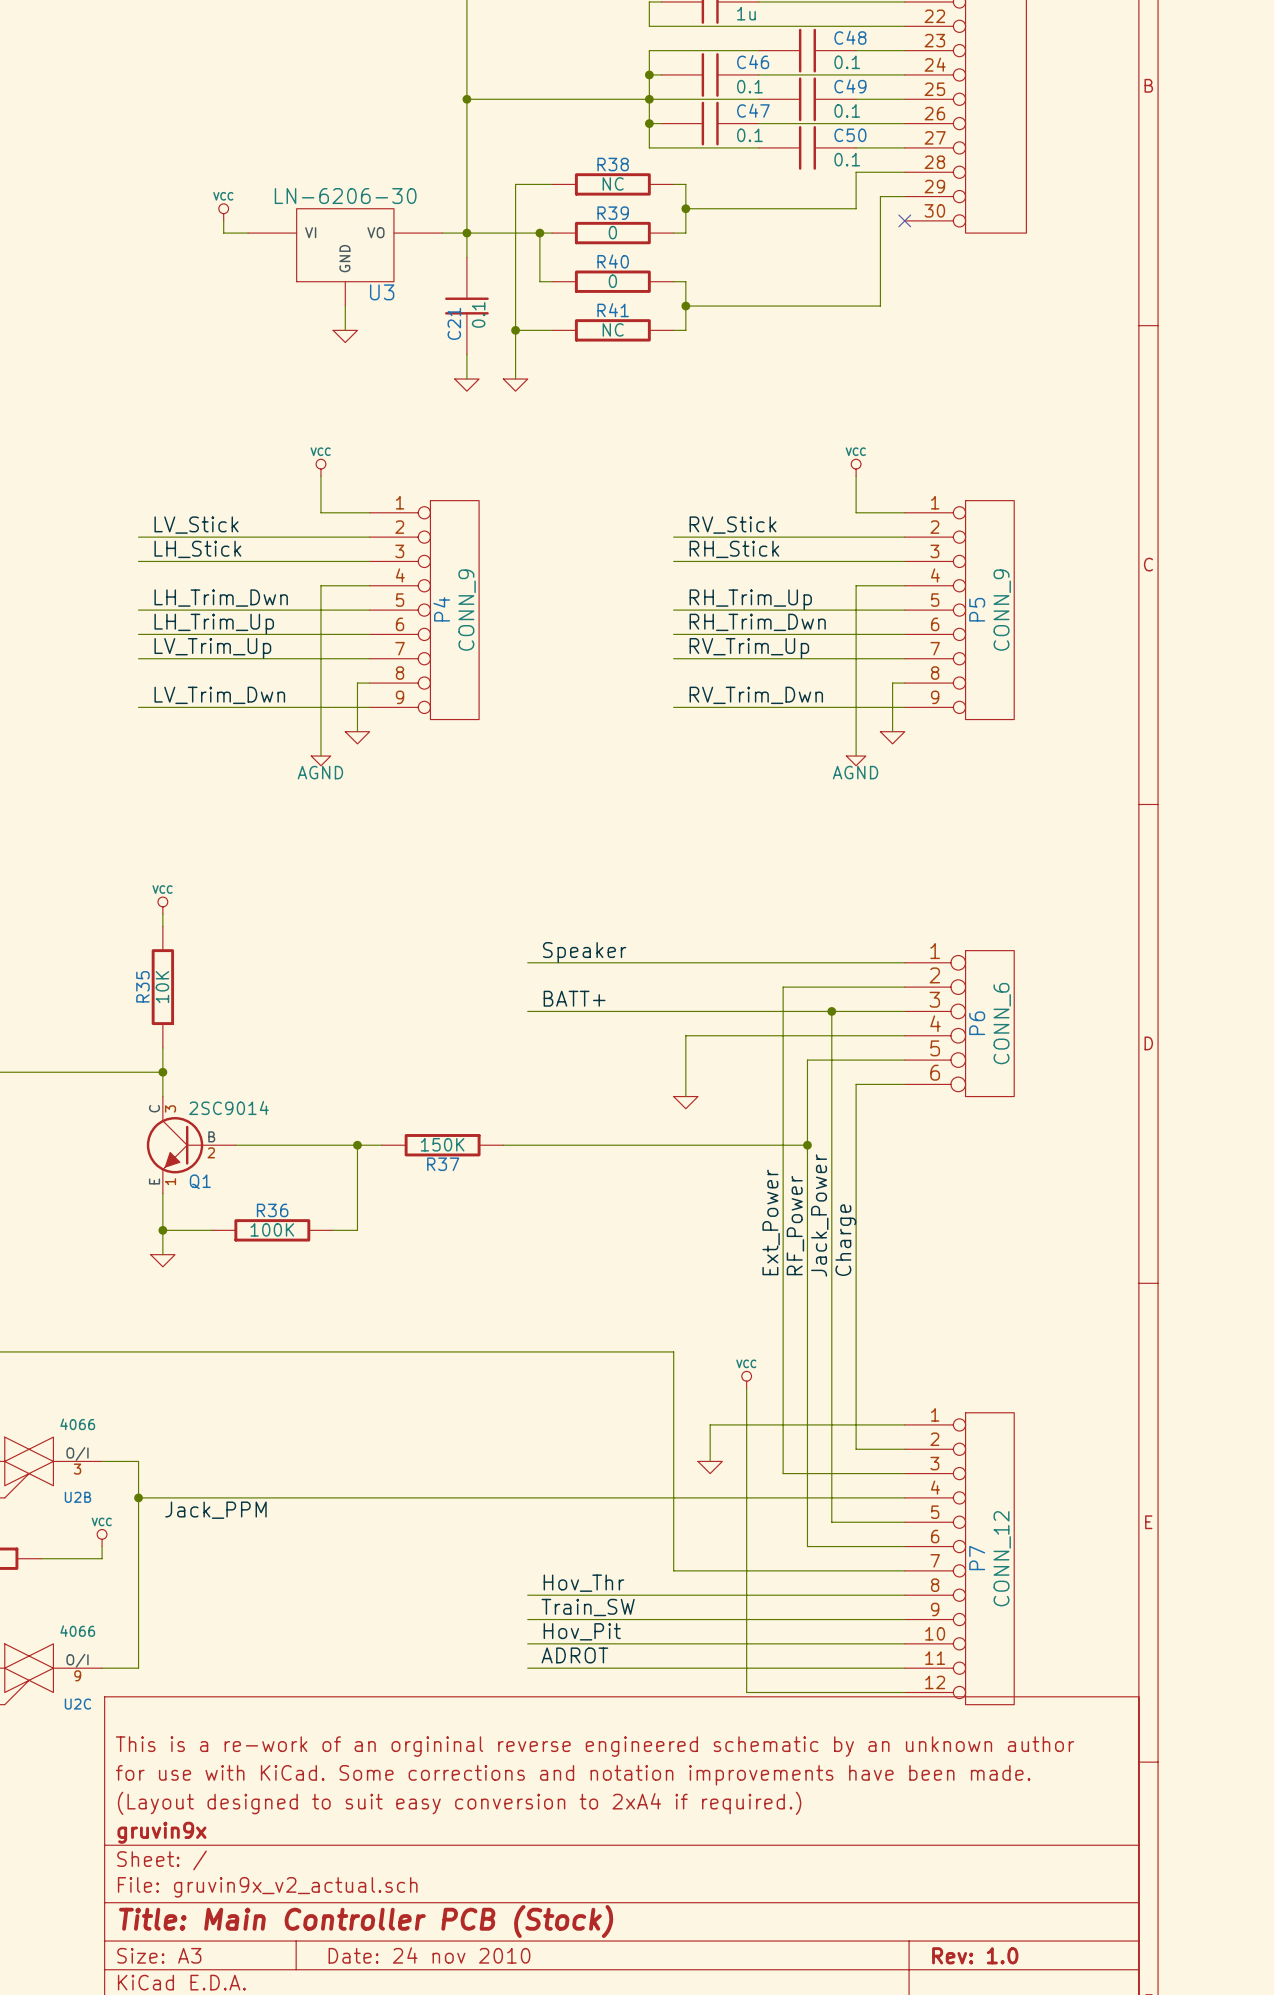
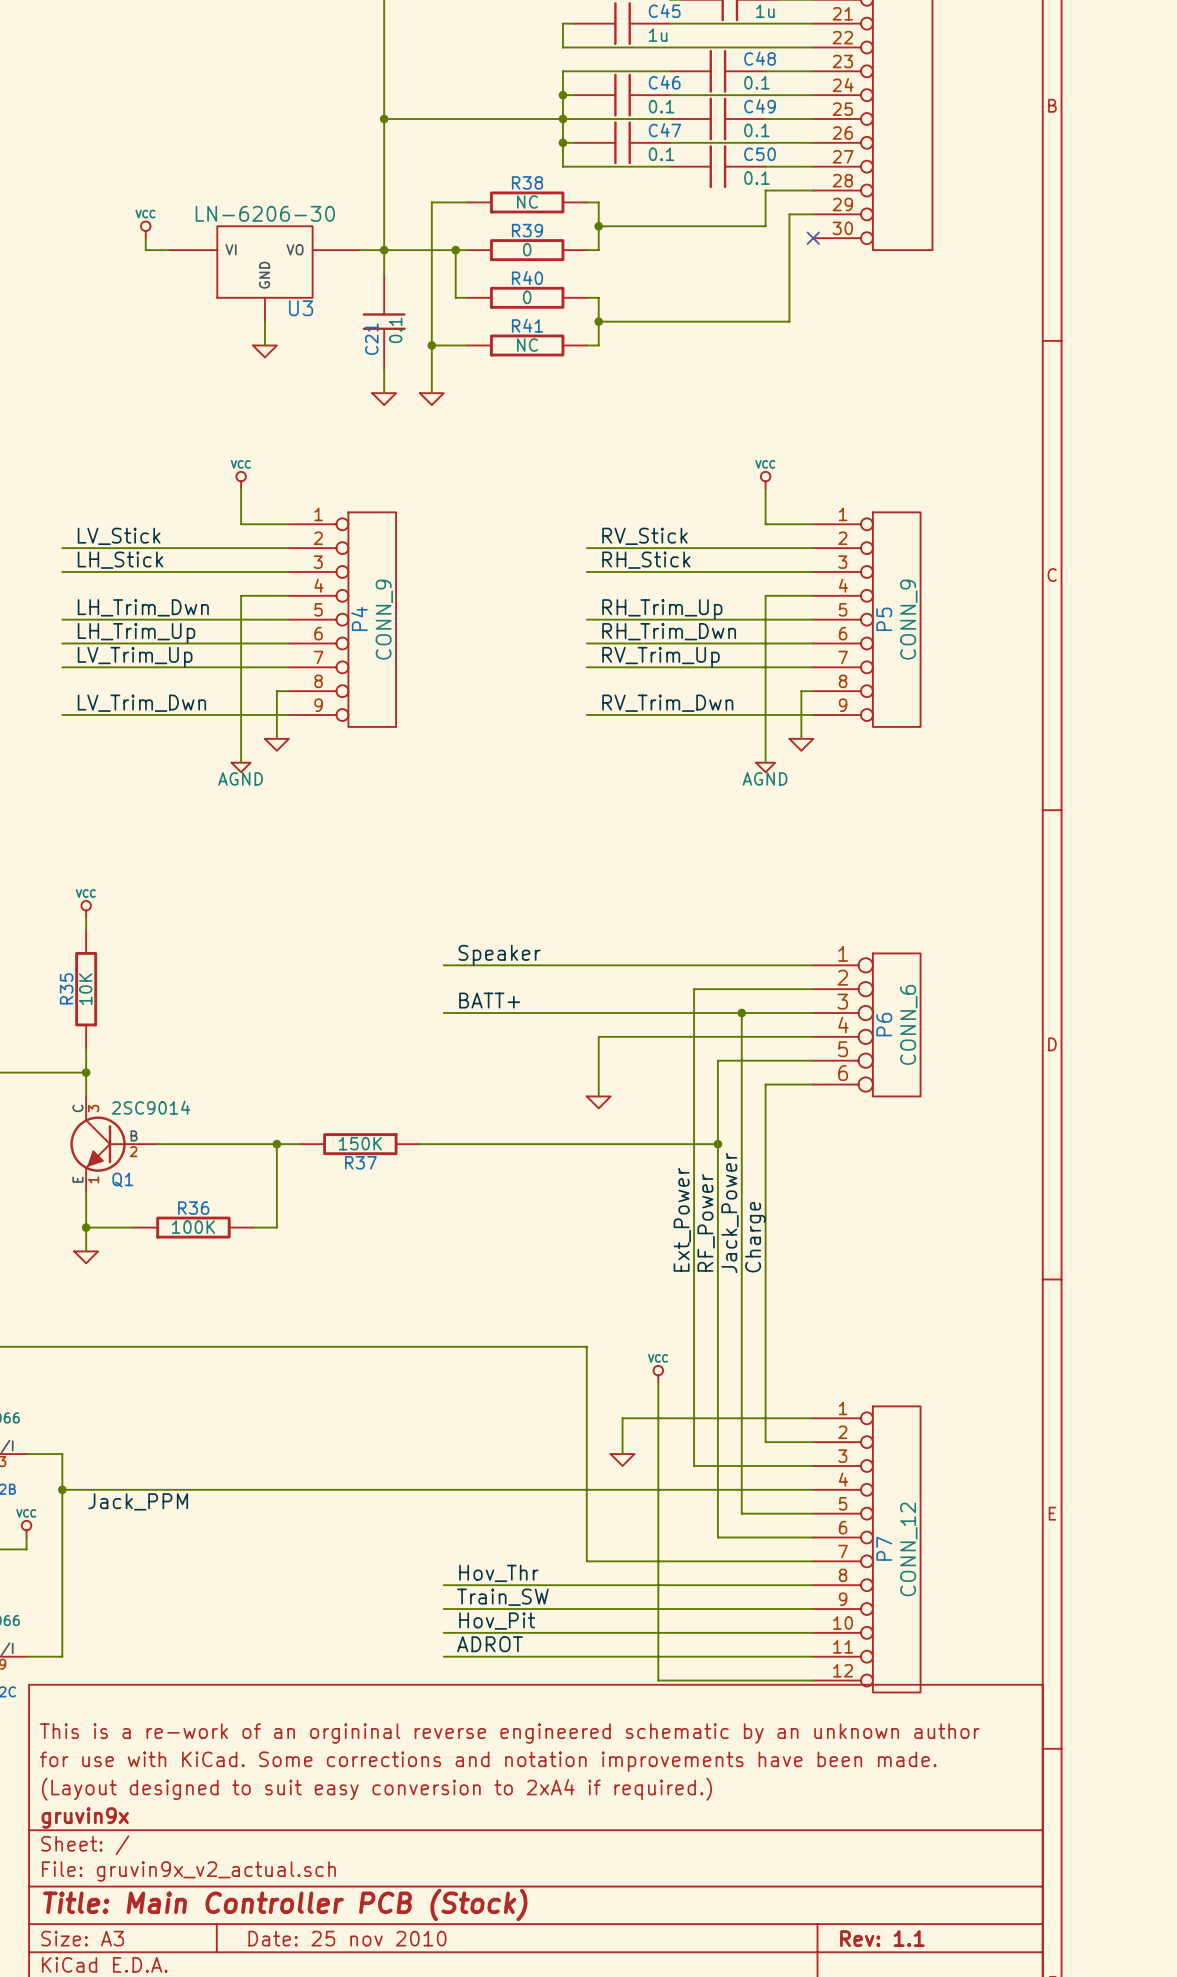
title block: Date: 24 nov 2010 (429, 1955) -> Date: 25 nov 2010 (347, 1938)
title block: Rev: 1.0 (975, 1955) -> Rev: 1.1 (882, 1938)

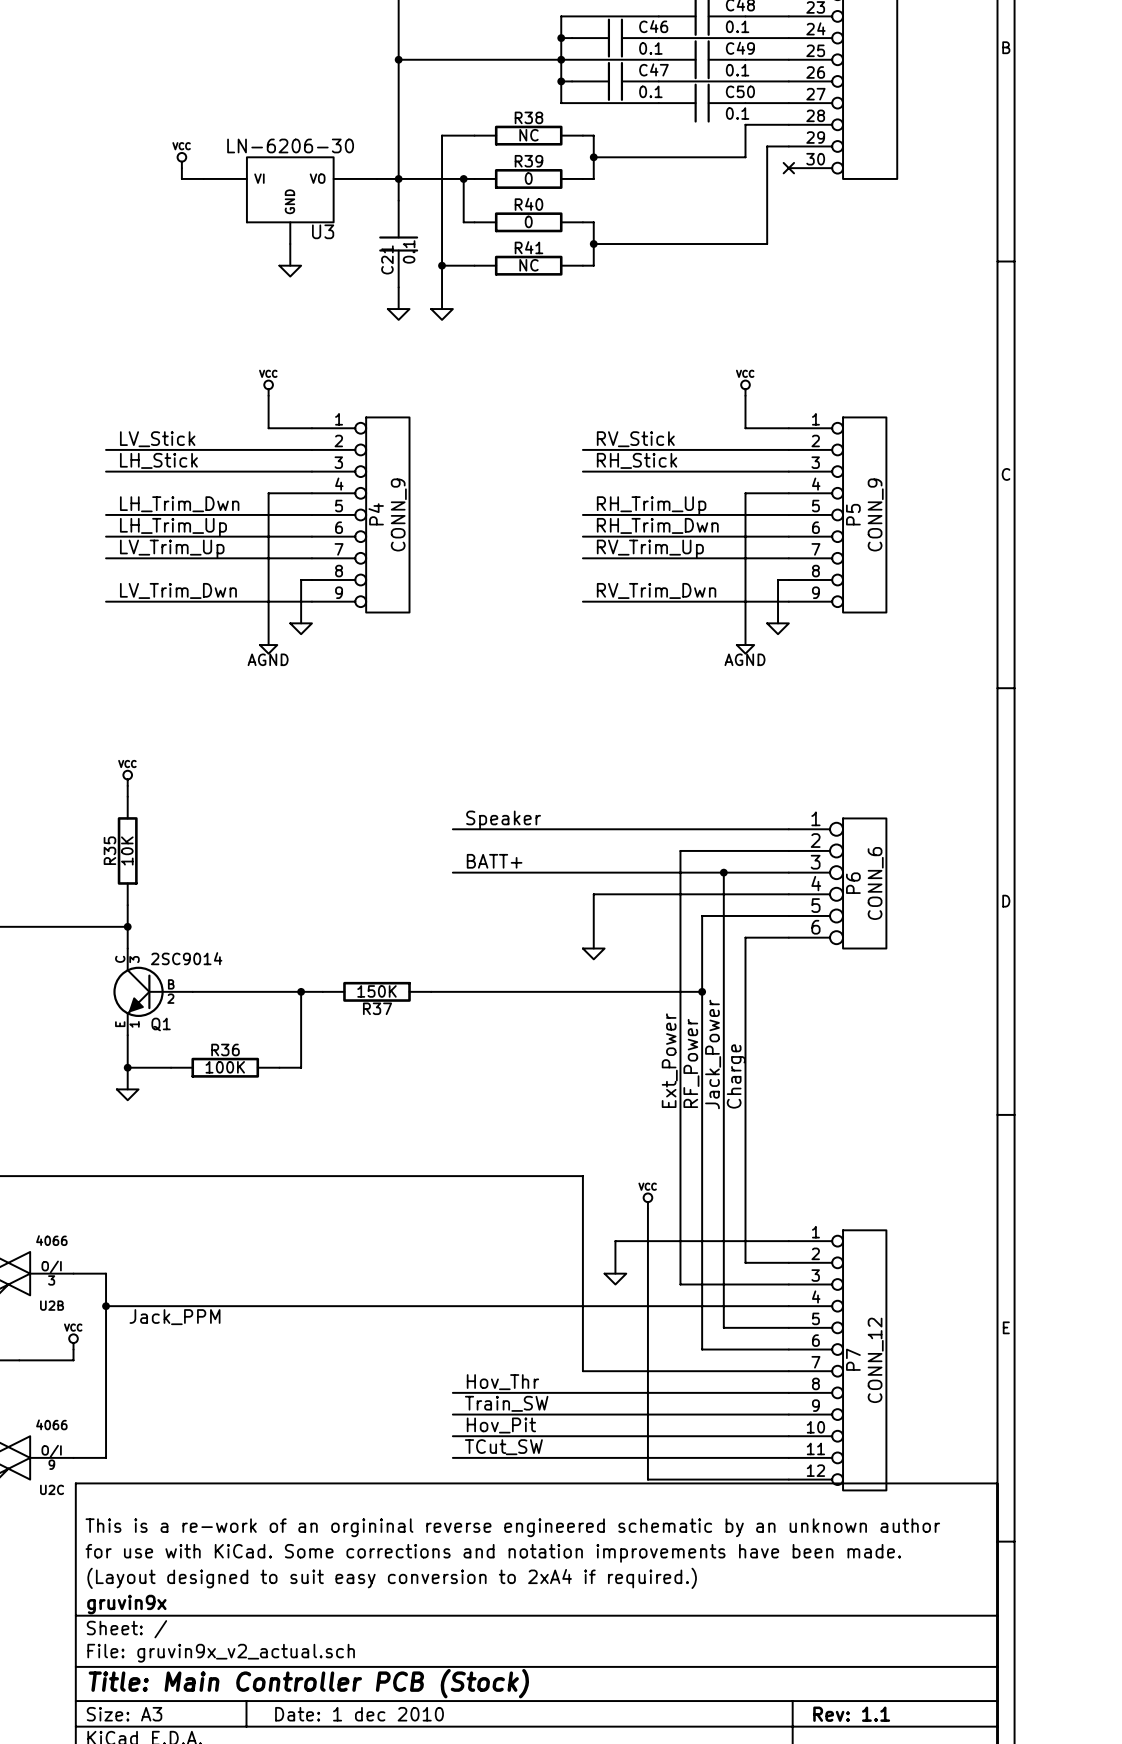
label: ADROT (490, 1644) -> TCut_SW (503, 1447)
title block: Date: 25 nov 2010 (347, 1938) -> Date: 1 dec 2010 (359, 1714)

